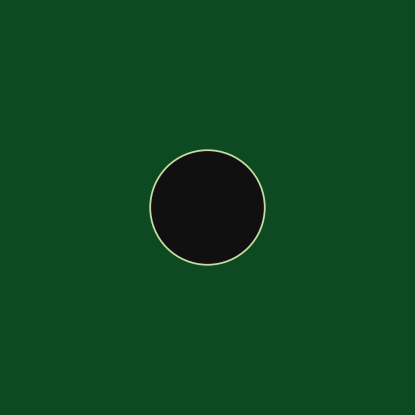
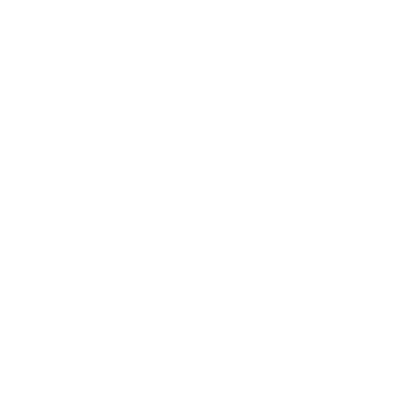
part: (207, 207) -> none

